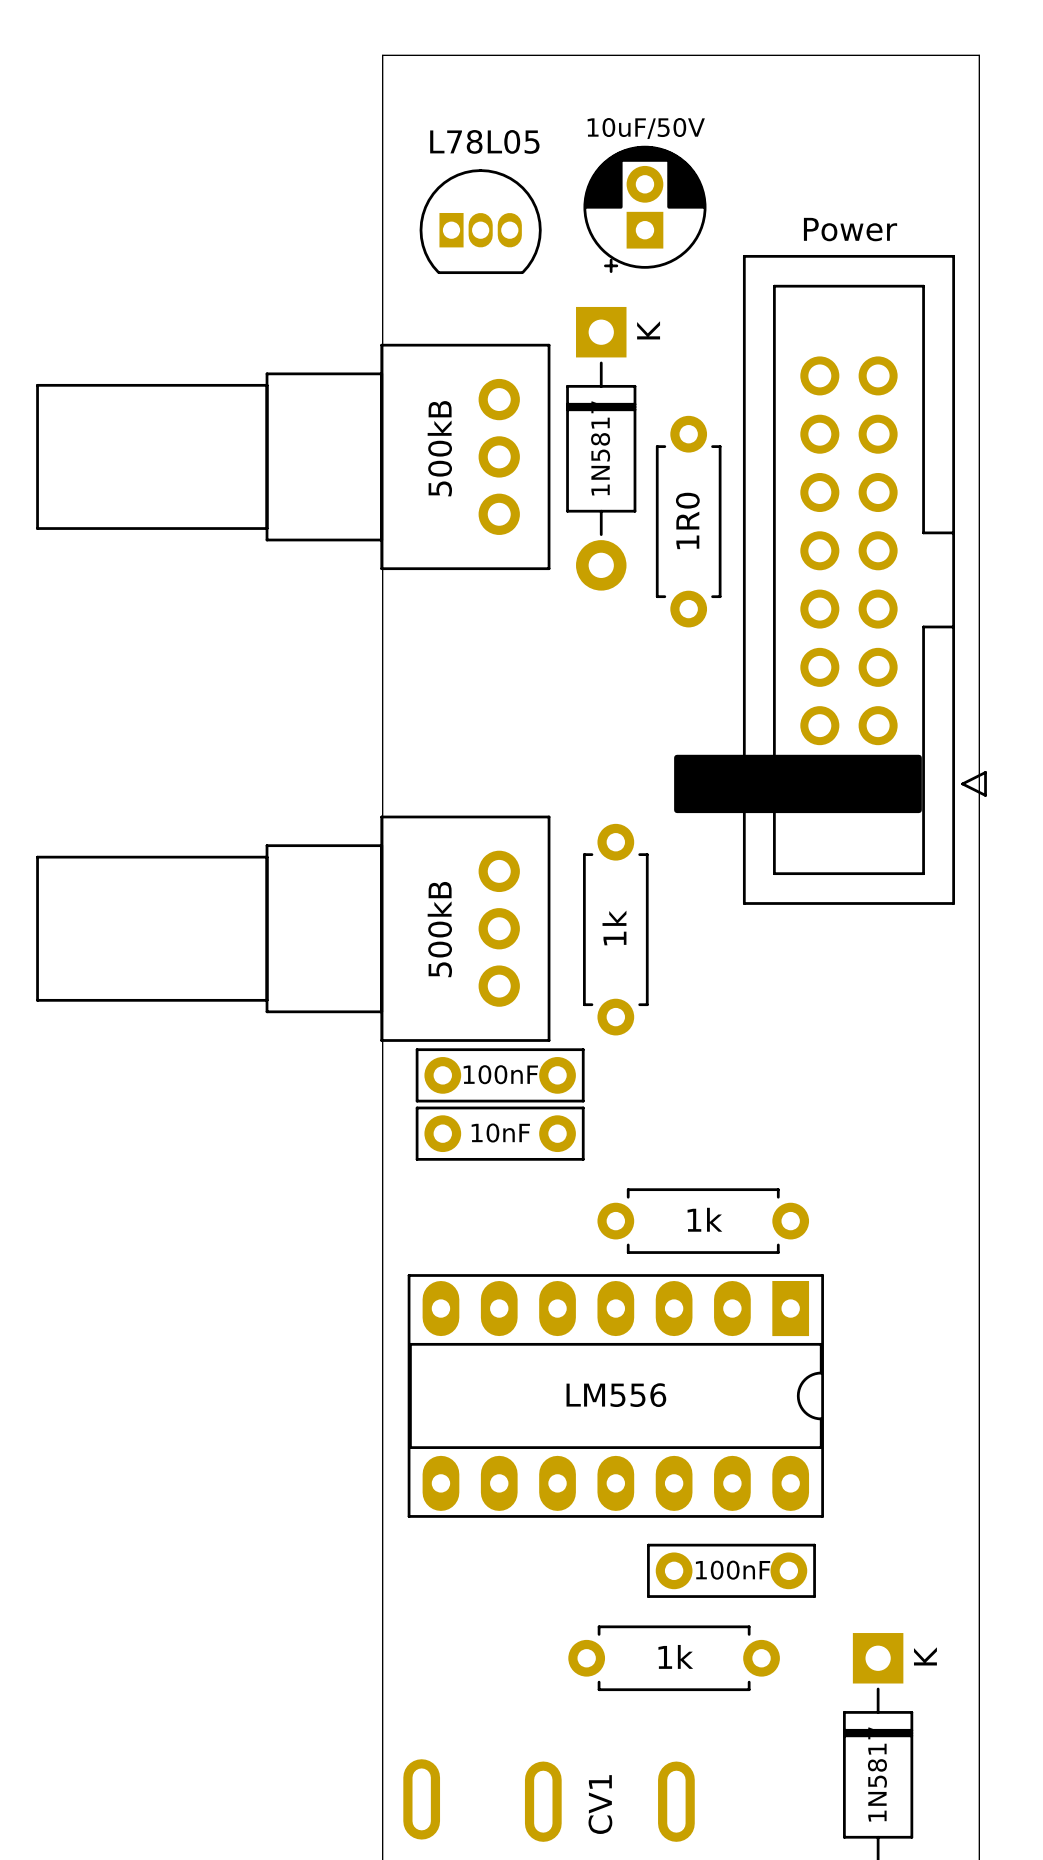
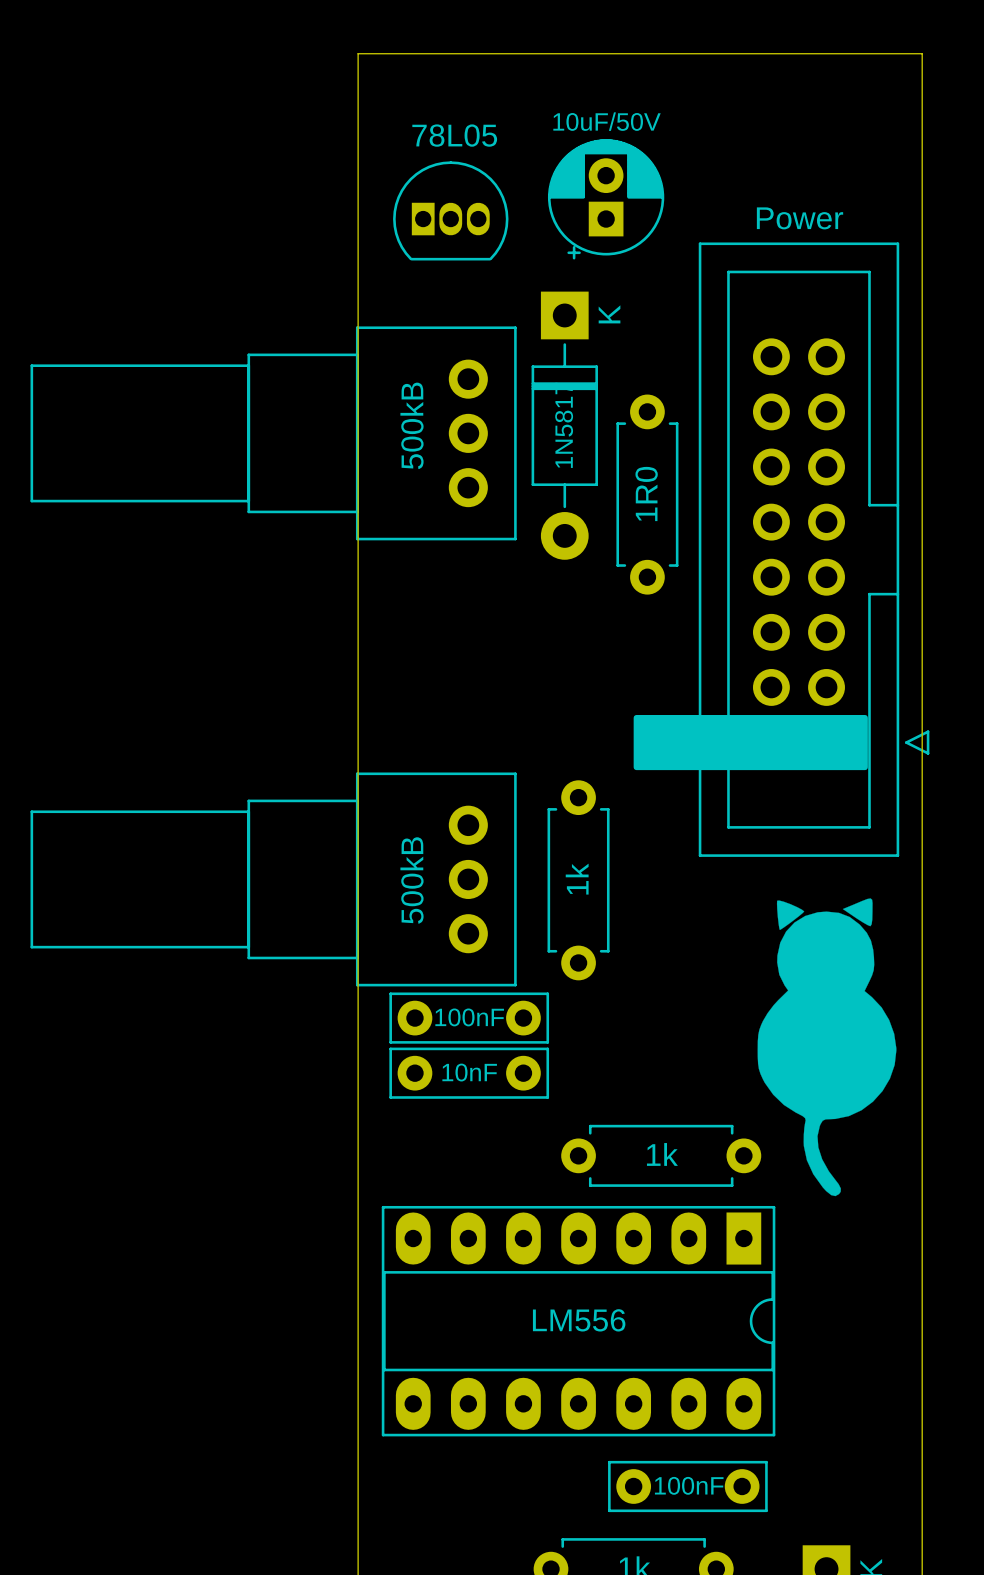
part value: L78L05 (484, 141) -> 78L05 (454, 135)
drawing: none -> [757, 898, 897, 1197]

